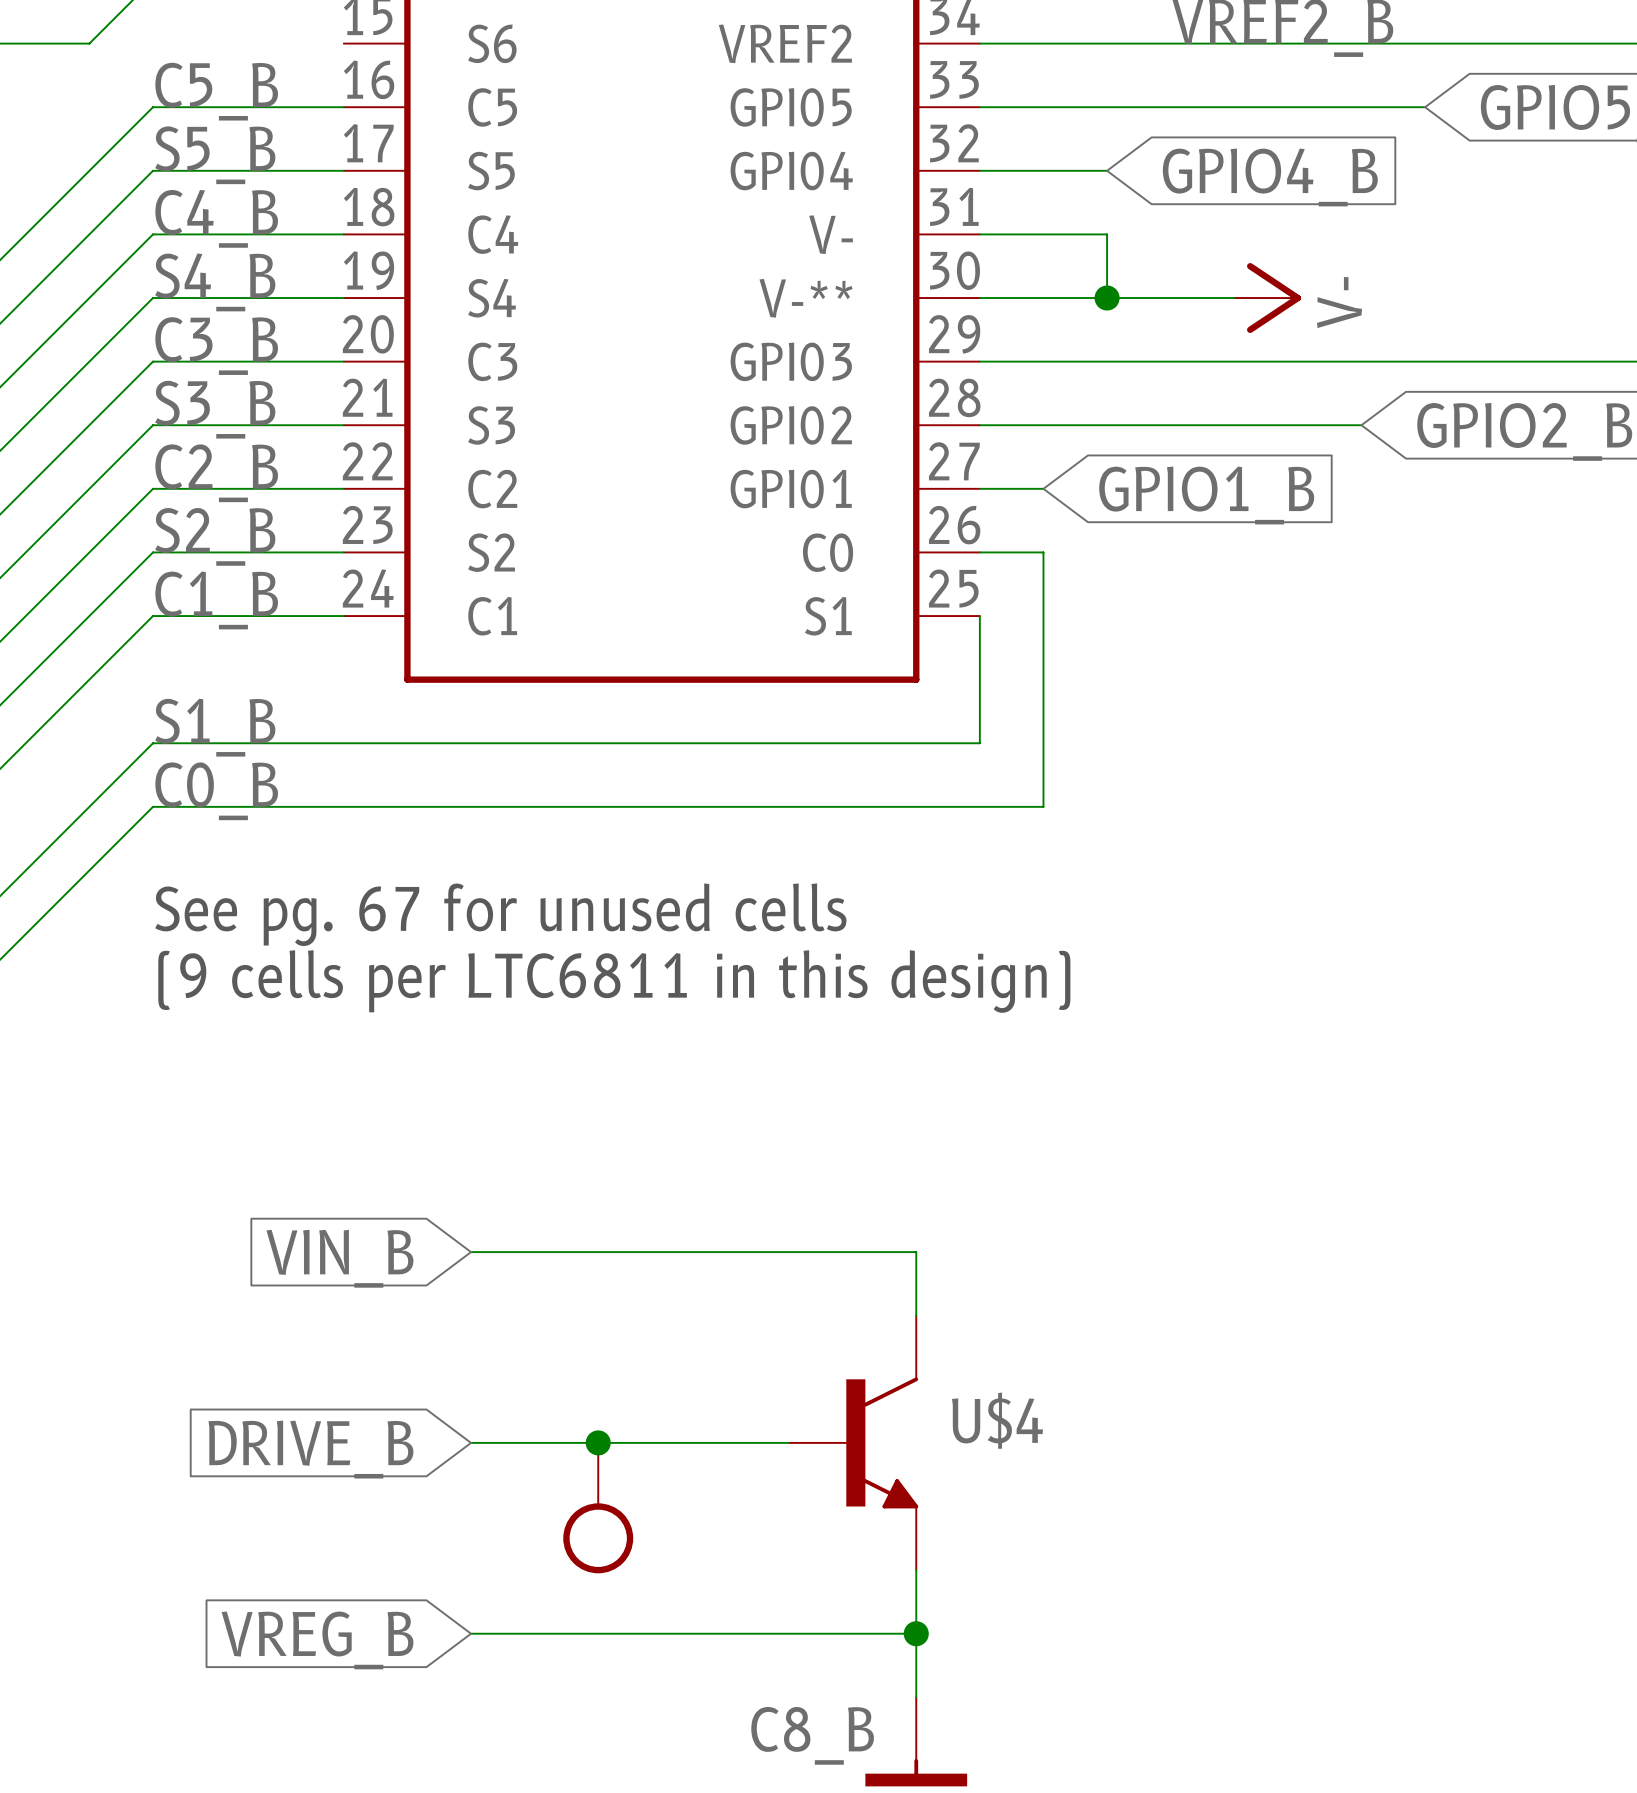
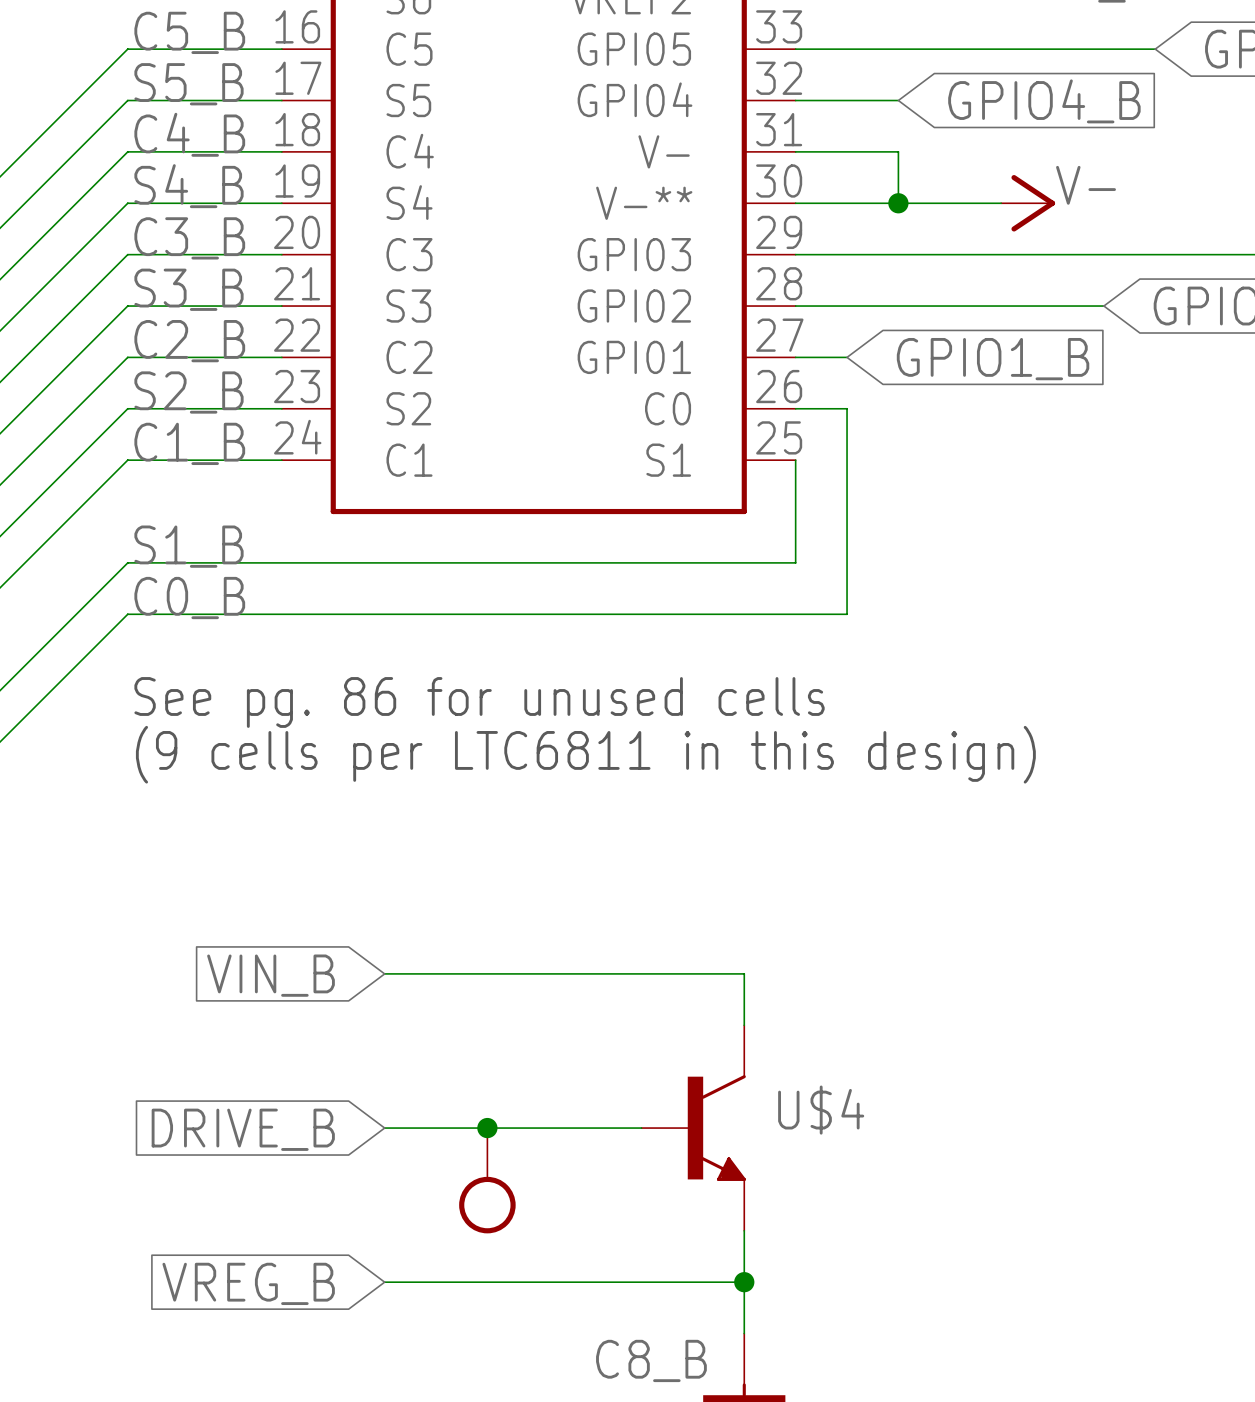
power symbol text rotation: 0° (1339, 302) -> 90° clockwise (1086, 185)
text: See pg. 67 for unused cells (500, 914) -> See pg. 86 for unused cells (479, 702)

